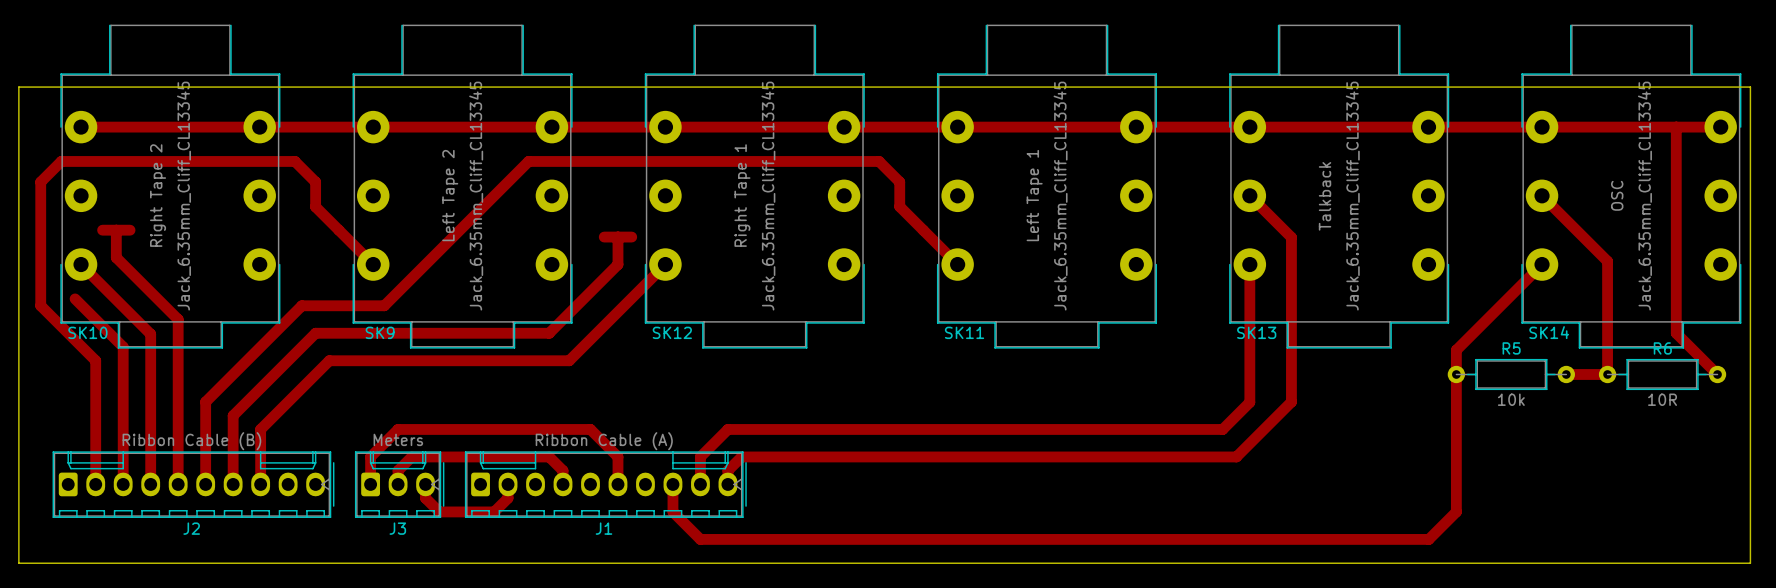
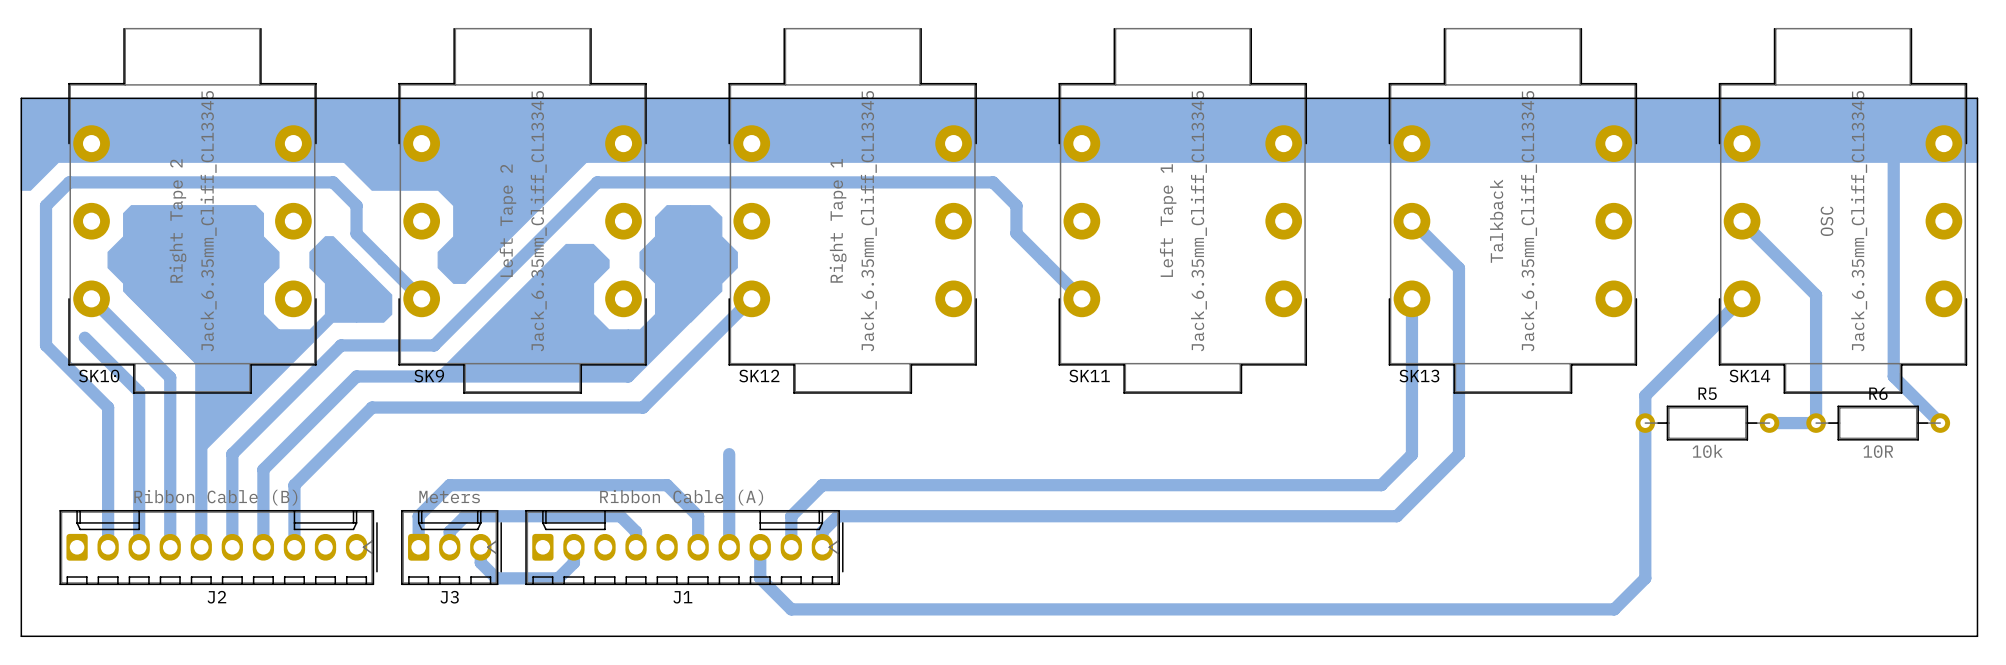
drawing: none -> [20, 97, 1979, 455]
top track: (81, 127) (1720, 127) -> none
top track: (1676, 127) (1676, 333) (1717, 374) -> none
bottom track: none -> (1893, 143) (1893, 376) (1940, 423)
top track: (1249, 195) (1291, 237) (1291, 401) (1236, 456) (741, 456) (727, 470) (727, 484) -> none
bottom track: none -> (1411, 221) (1458, 268) (1458, 454) (1396, 516) (837, 516) (822, 531) (822, 547)
top track: (1542, 195) (1607, 261) (1607, 374) (1566, 374) -> none
bottom track: none -> (1742, 221) (1816, 295) (1816, 423) (1769, 423)
top track: (102, 230) (130, 230) -> none
top track: (116, 230) (116, 257) (178, 319) (178, 484) -> none
top track: (604, 237) (631, 237) -> none
top track: (617, 237) (617, 264) (549, 333) (315, 333) (233, 415) (233, 484) -> none
bottom track: none -> (698, 267) (698, 306) (628, 376) (356, 376) (263, 469) (263, 547)
bottom track: none -> (131, 291) (201, 360) (201, 547)
top track: (81, 264) (150, 334) (150, 484) -> none
bottom track: none -> (91, 298) (170, 377) (170, 547)
top track: (373, 264) (315, 206) (315, 182) (295, 161) (61, 161) (40, 182) (40, 305) (95, 360) (95, 484) -> none
bottom track: none -> (421, 298) (356, 233) (356, 205) (333, 182) (69, 182) (46, 205) (46, 345) (108, 407) (108, 547)
top track: (665, 264) (569, 360) (329, 360) (260, 429) (260, 484) -> none
bottom track: none -> (751, 298) (643, 407) (372, 407) (294, 485) (294, 547)
top track: (957, 264) (899, 206) (899, 182) (879, 161) (528, 161) (384, 305) (301, 305) (205, 401) (205, 484) -> none
bottom track: none -> (1081, 298) (1016, 233) (1016, 205) (993, 182) (597, 182) (434, 345) (341, 345) (232, 454) (232, 547)
top track: (1249, 264) (1249, 402) (1222, 429) (727, 429) (700, 456) (700, 484) -> none
bottom track: none -> (1411, 298) (1411, 454) (1381, 485) (822, 485) (791, 516) (791, 547)
top track: (1542, 264) (1456, 350) (1456, 511) (1428, 539) (700, 539) (672, 511) (672, 484) -> none
bottom track: none -> (1742, 298) (1645, 395) (1645, 578) (1614, 609) (791, 609) (760, 578) (760, 547)
top track: (75, 298) (123, 347) (123, 484) -> none
bottom track: none -> (84, 337) (139, 392) (139, 547)
bottom track: none -> (729, 454) (729, 547)
top track: (370, 484) (370, 456) (398, 429) (590, 429) (617, 456) (617, 484) -> none
bottom track: none -> (418, 547) (418, 516) (449, 485) (667, 485) (698, 516) (698, 547)
top track: (398, 484) (398, 470) (411, 456) (549, 456) (563, 470) (563, 484) -> none
bottom track: none -> (449, 547) (449, 531) (465, 516) (620, 516) (636, 531) (636, 547)
top track: (425, 484) (425, 498) (439, 511) (494, 511) (508, 498) (508, 484) -> none
bottom track: none -> (480, 547) (480, 562) (496, 578) (558, 578) (573, 562) (573, 547)

